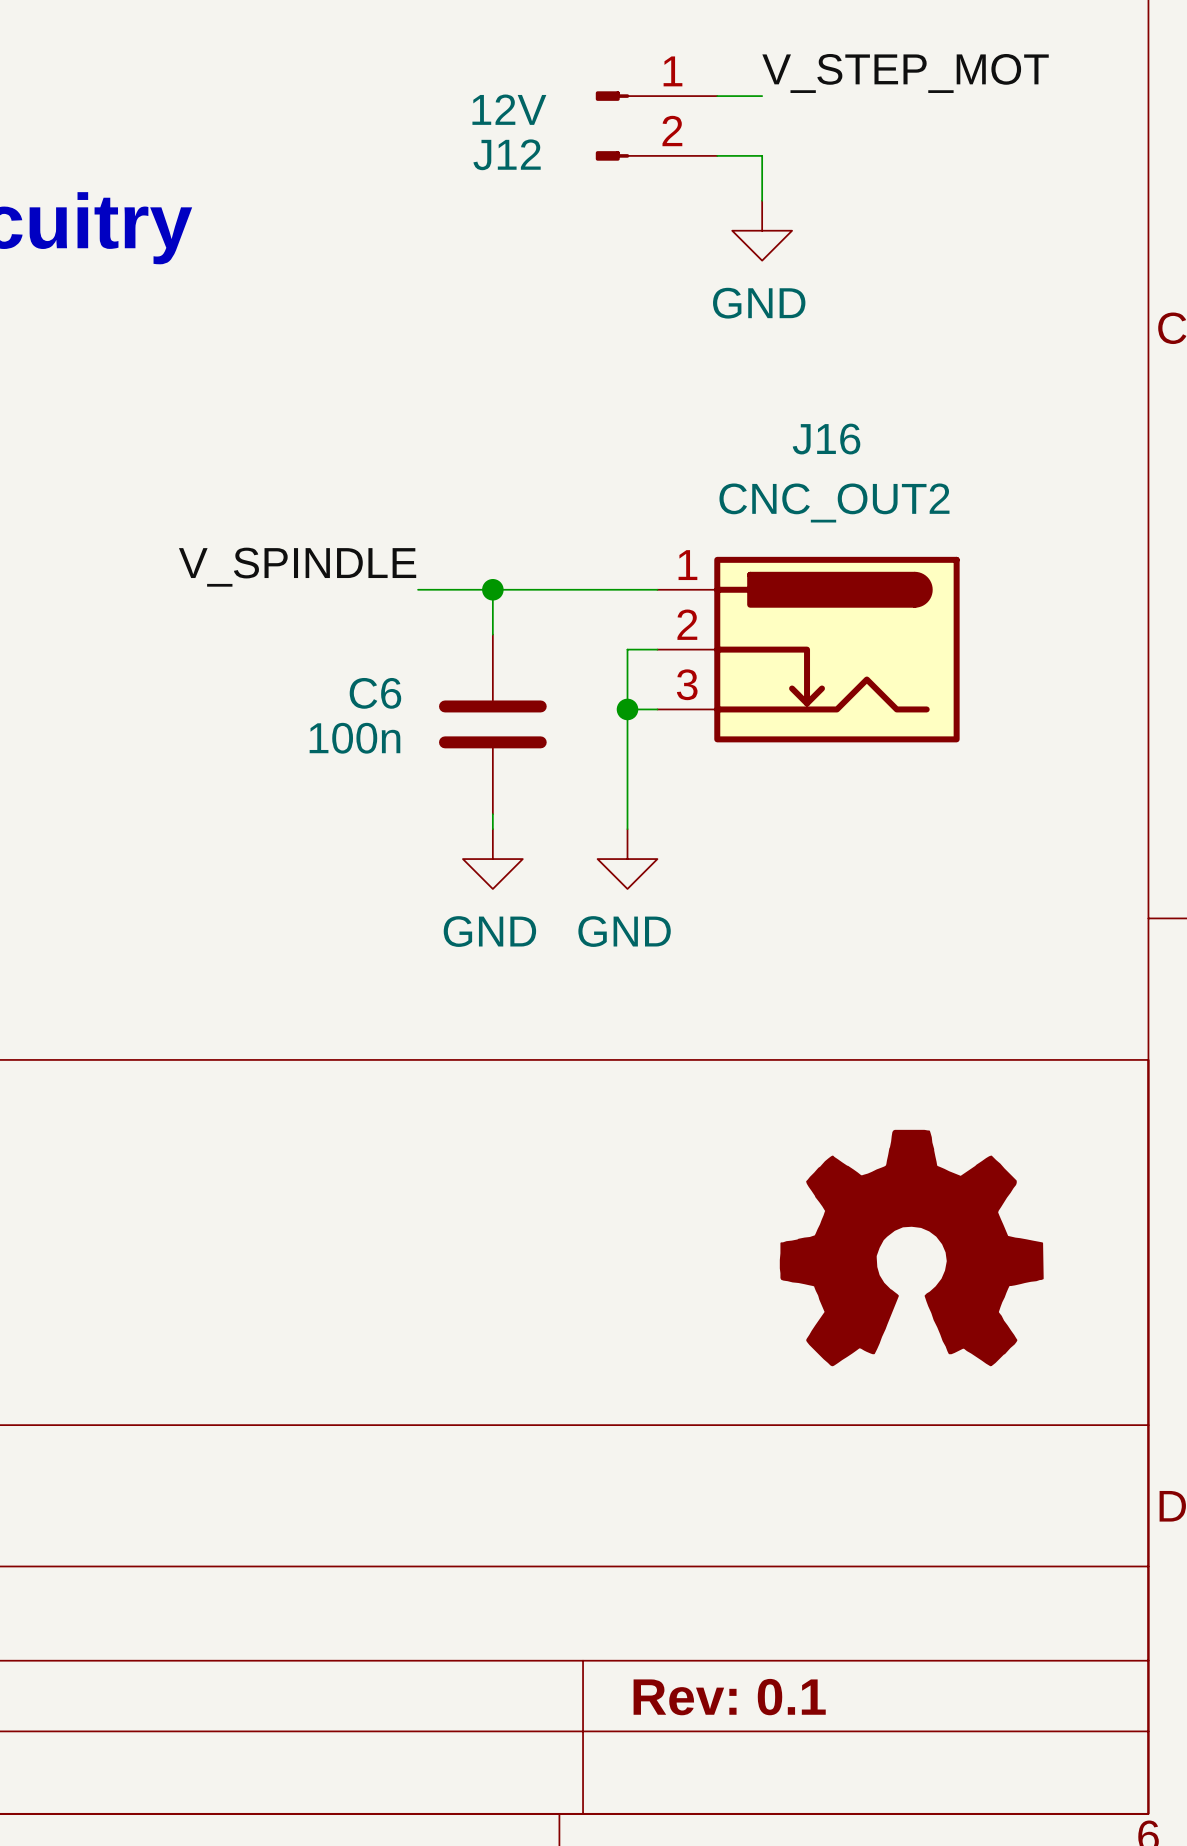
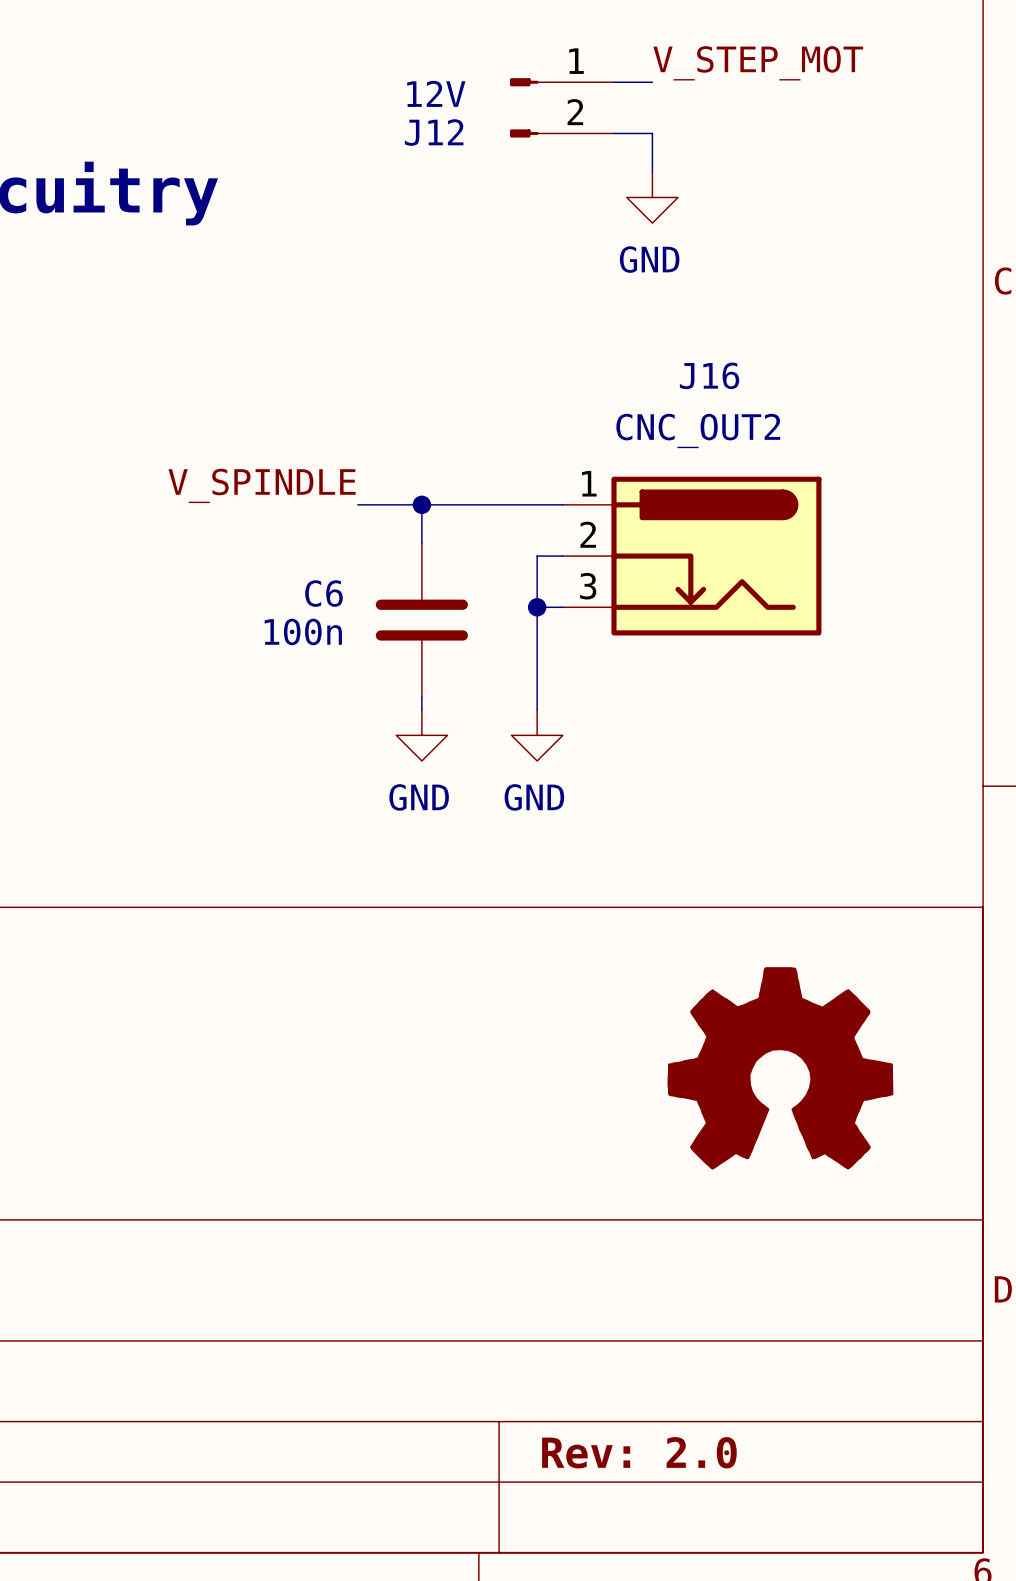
title block: Rev: 0.1 (729, 1697) -> Rev: 2.0 (639, 1452)

